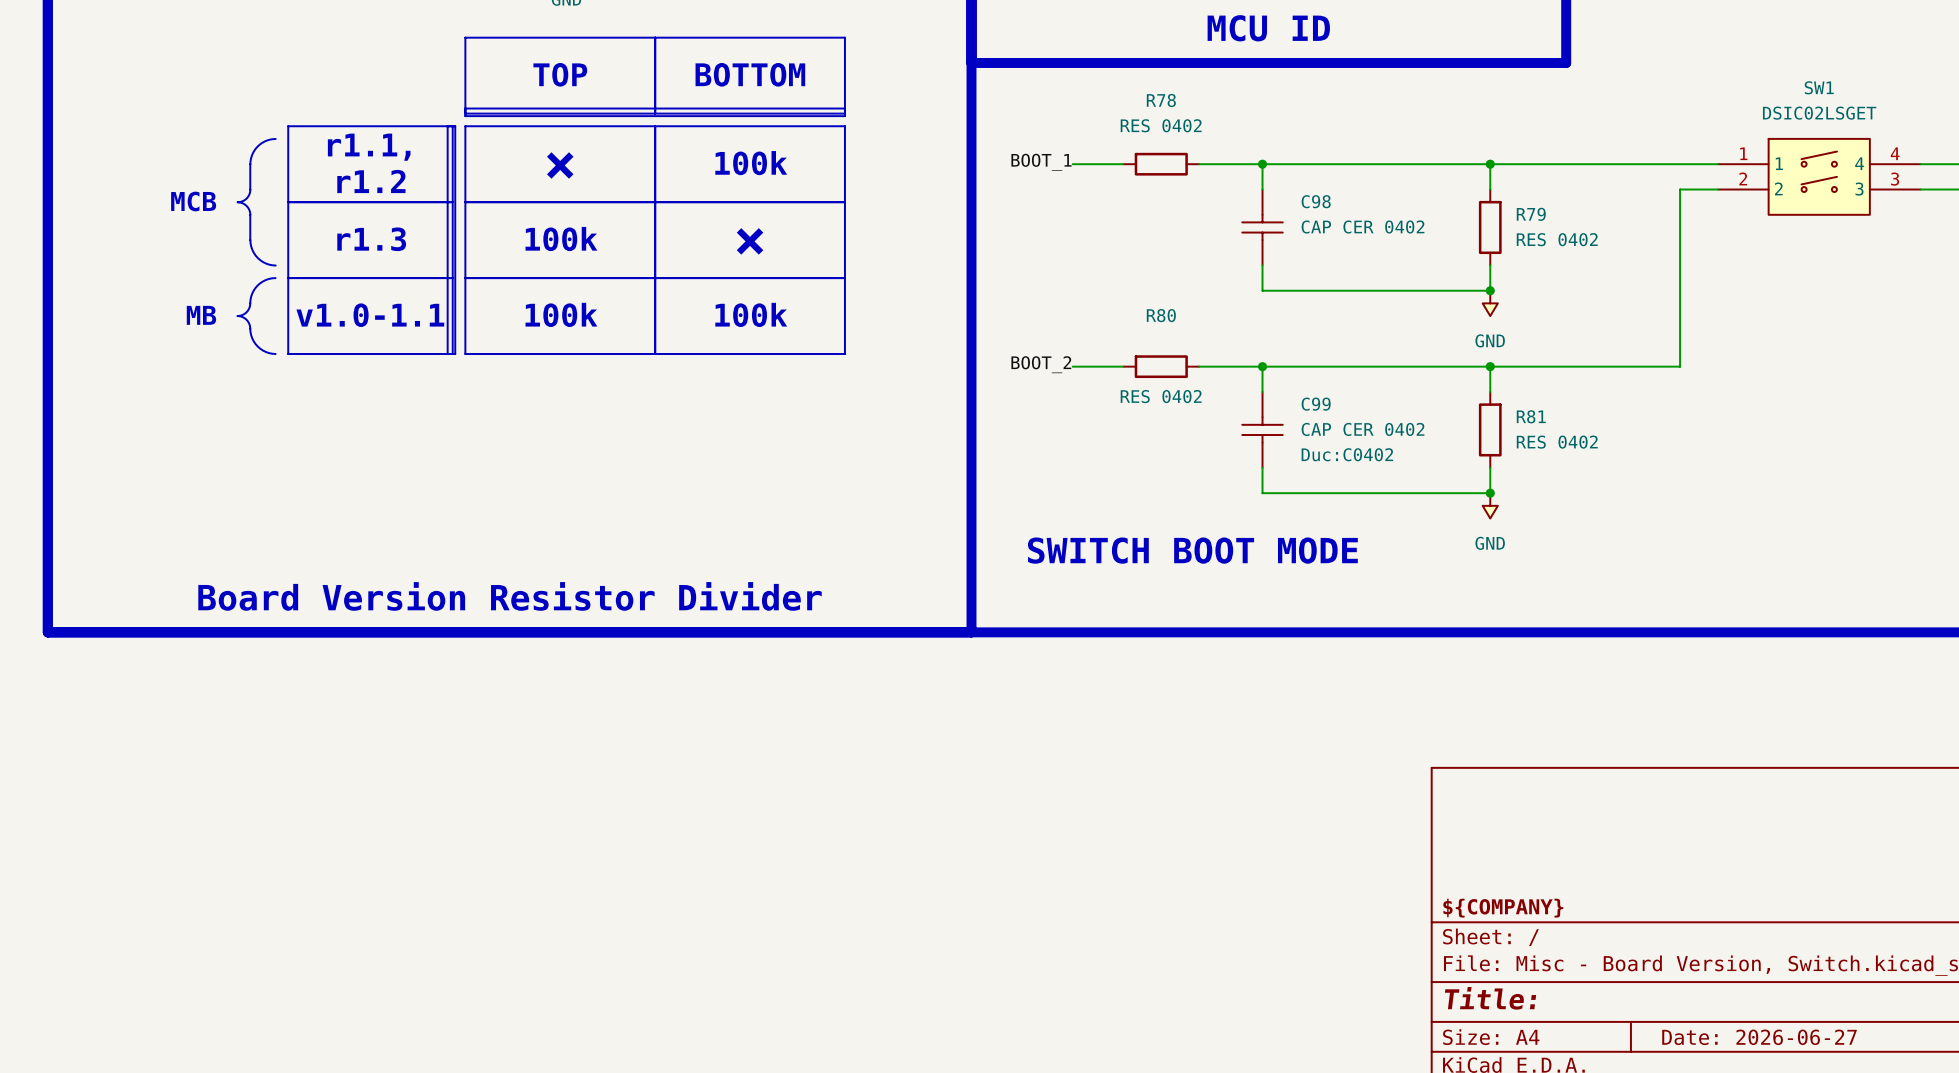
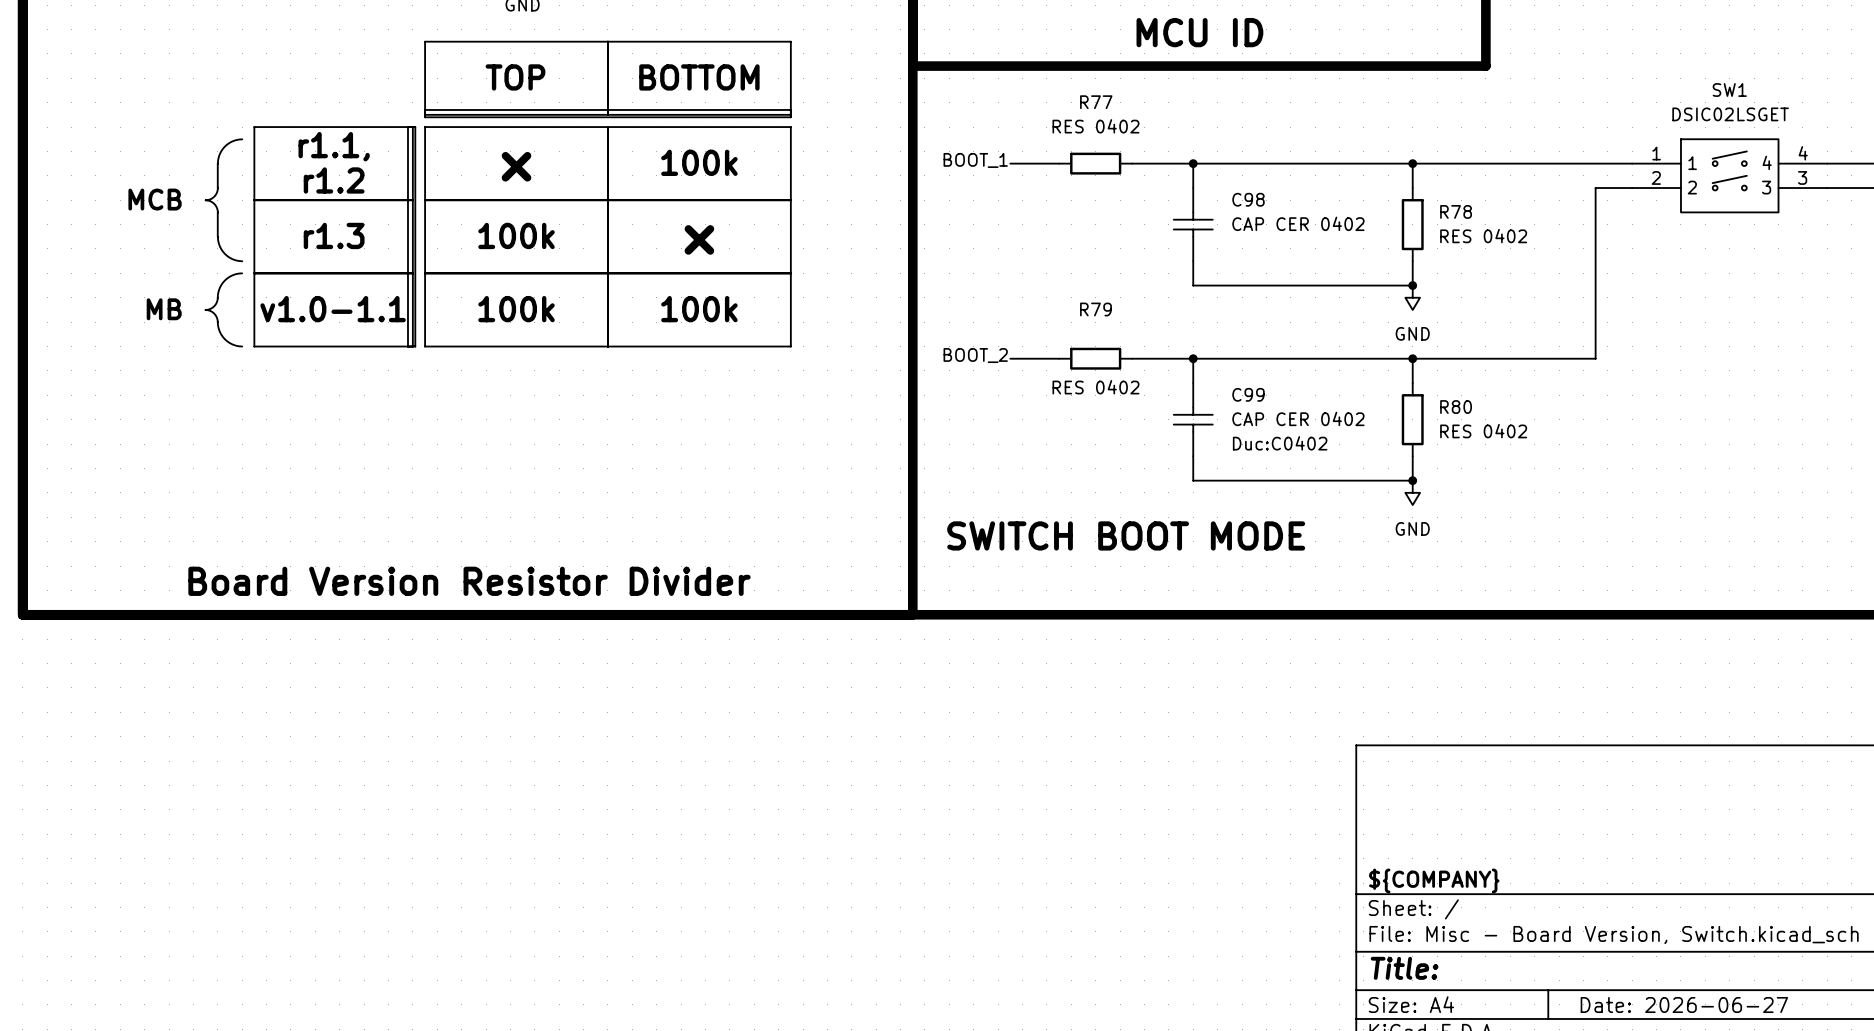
R78 name: R78 (1161, 100) -> R77 (1096, 102)
R79 name: R79 (1531, 214) -> R78 (1456, 211)
R80 name: R80 (1161, 315) -> R79 (1095, 309)
R81 name: R81 (1531, 416) -> R80 (1456, 407)

